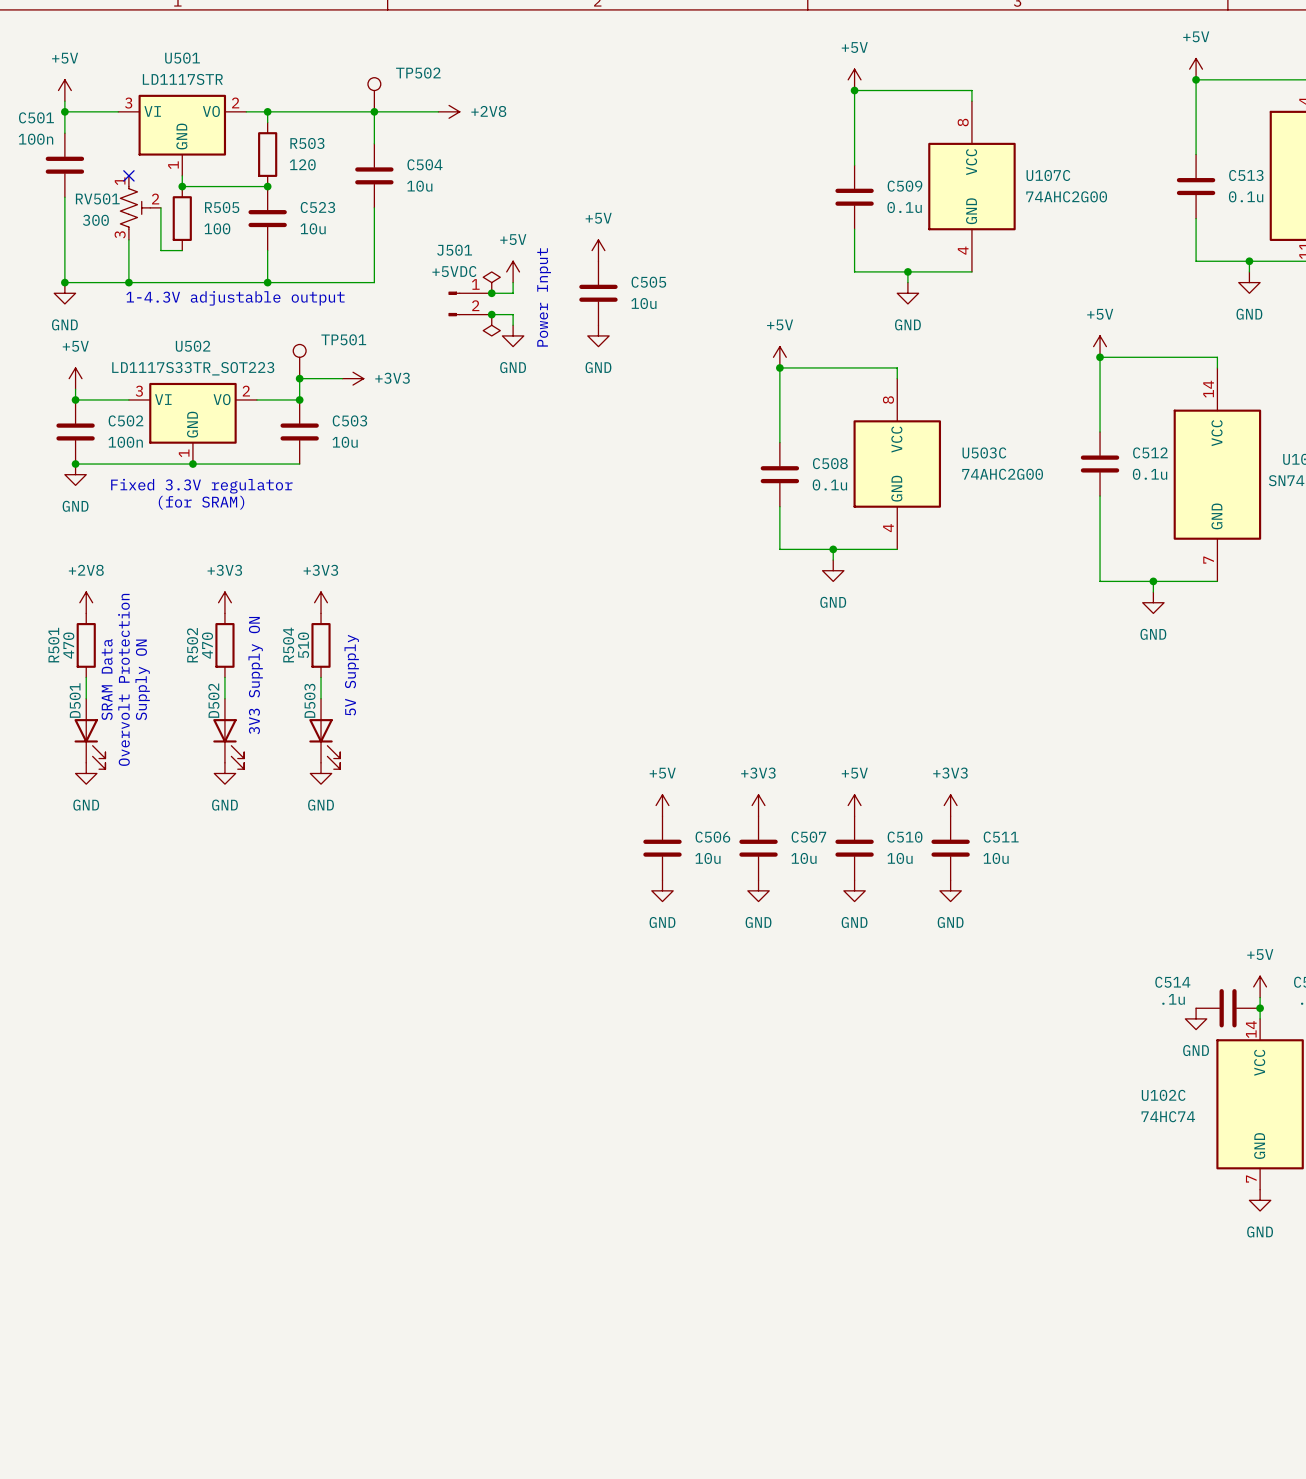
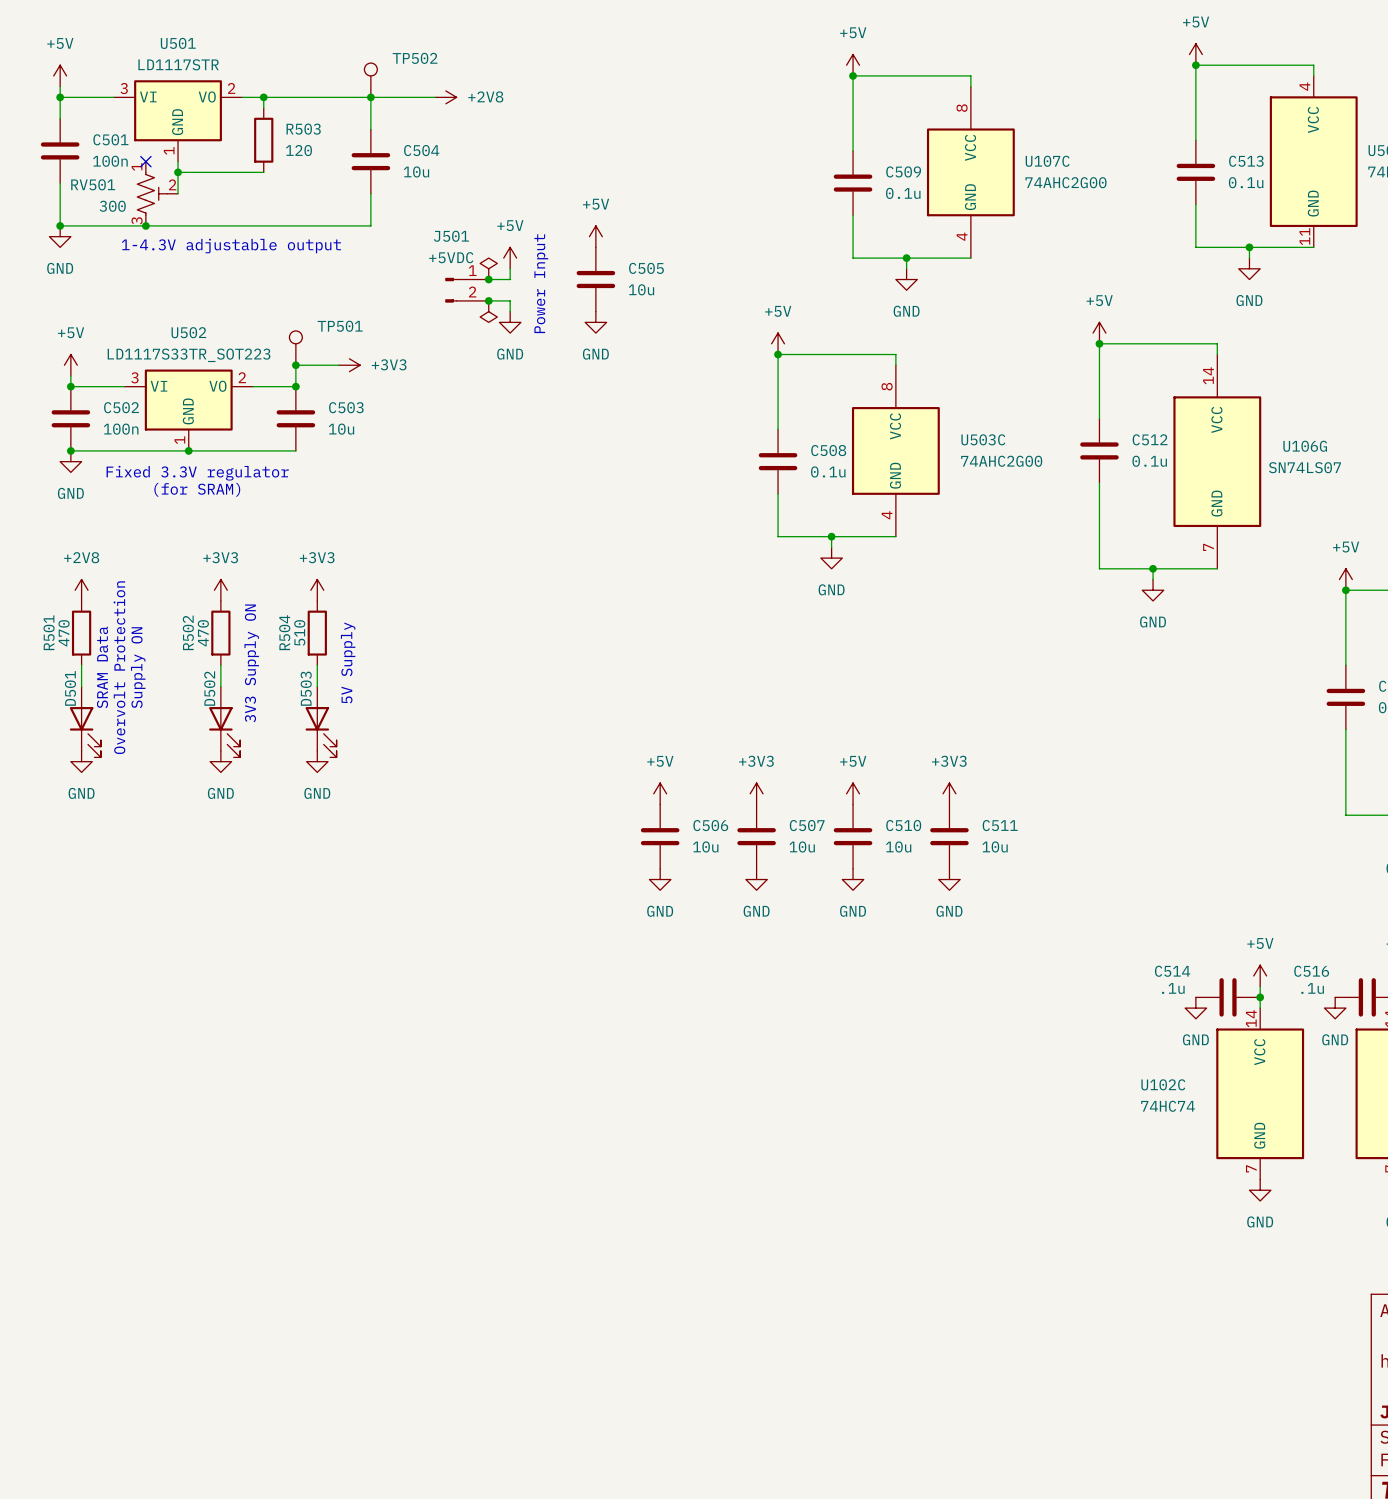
C501 name position: C501 (36, 117) -> C501 (110, 139)
C501 value position: 100n (35, 139) -> 100n (110, 161)
no-connect mark position: (128, 175) -> (145, 161)
junction: (267, 186) -> none
RV501 position: (140, 207) -> (157, 193)
wire: (160, 207) (160, 250) (182, 250) -> none
R505: 100 (182, 218) -> none
C523: 10u (267, 218) -> none
wire: (64, 239) (64, 282) (374, 282) (374, 239) -> (60, 225) (370, 225)
junction: none -> (60, 225)
wire: (128, 239) (128, 282) -> none
junction: none -> (145, 225)
wire: (267, 250) (267, 282) -> none
junction: (64, 282) -> none
junction: (128, 282) -> none
junction: (267, 282) -> none
power symbol position: GND (64, 293) -> GND (60, 236)
text position: 1-4.3V adjustable output (235, 298) -> 1-4.3V adjustable output (231, 246)

